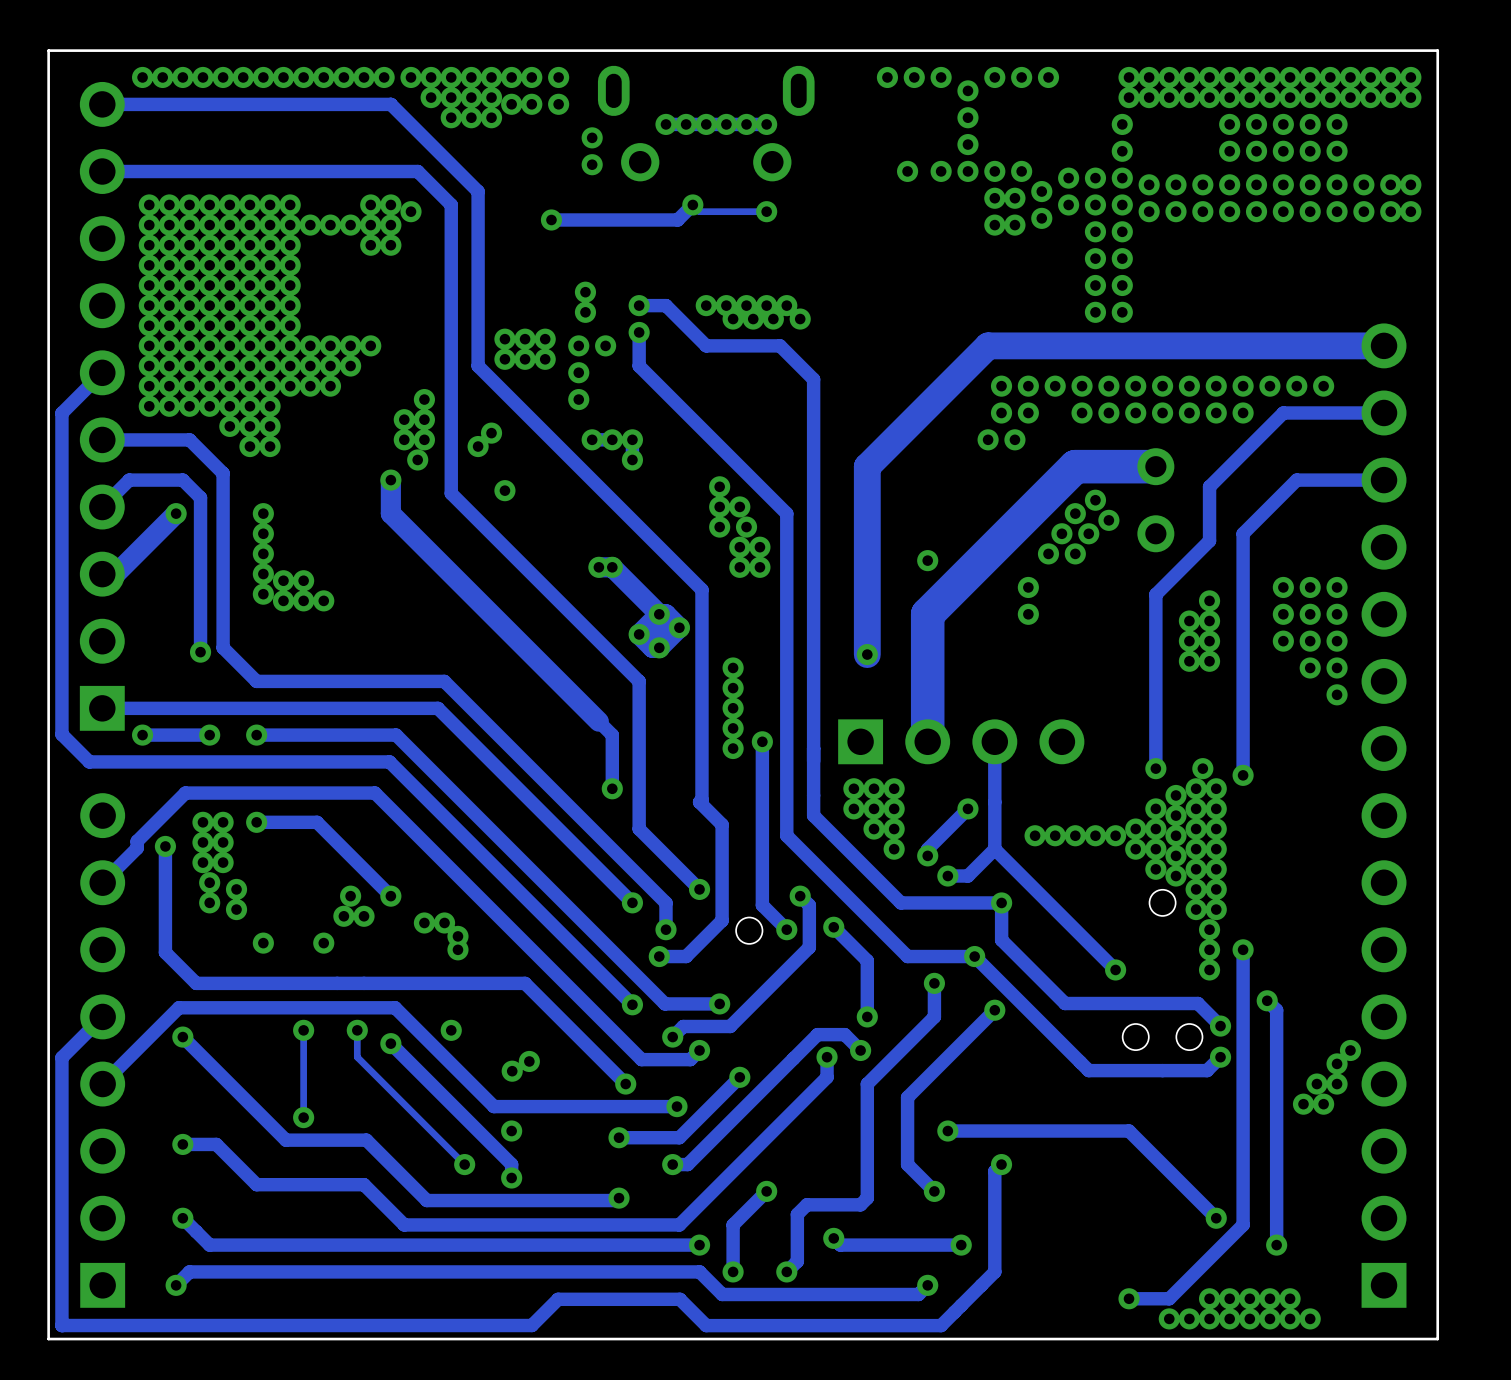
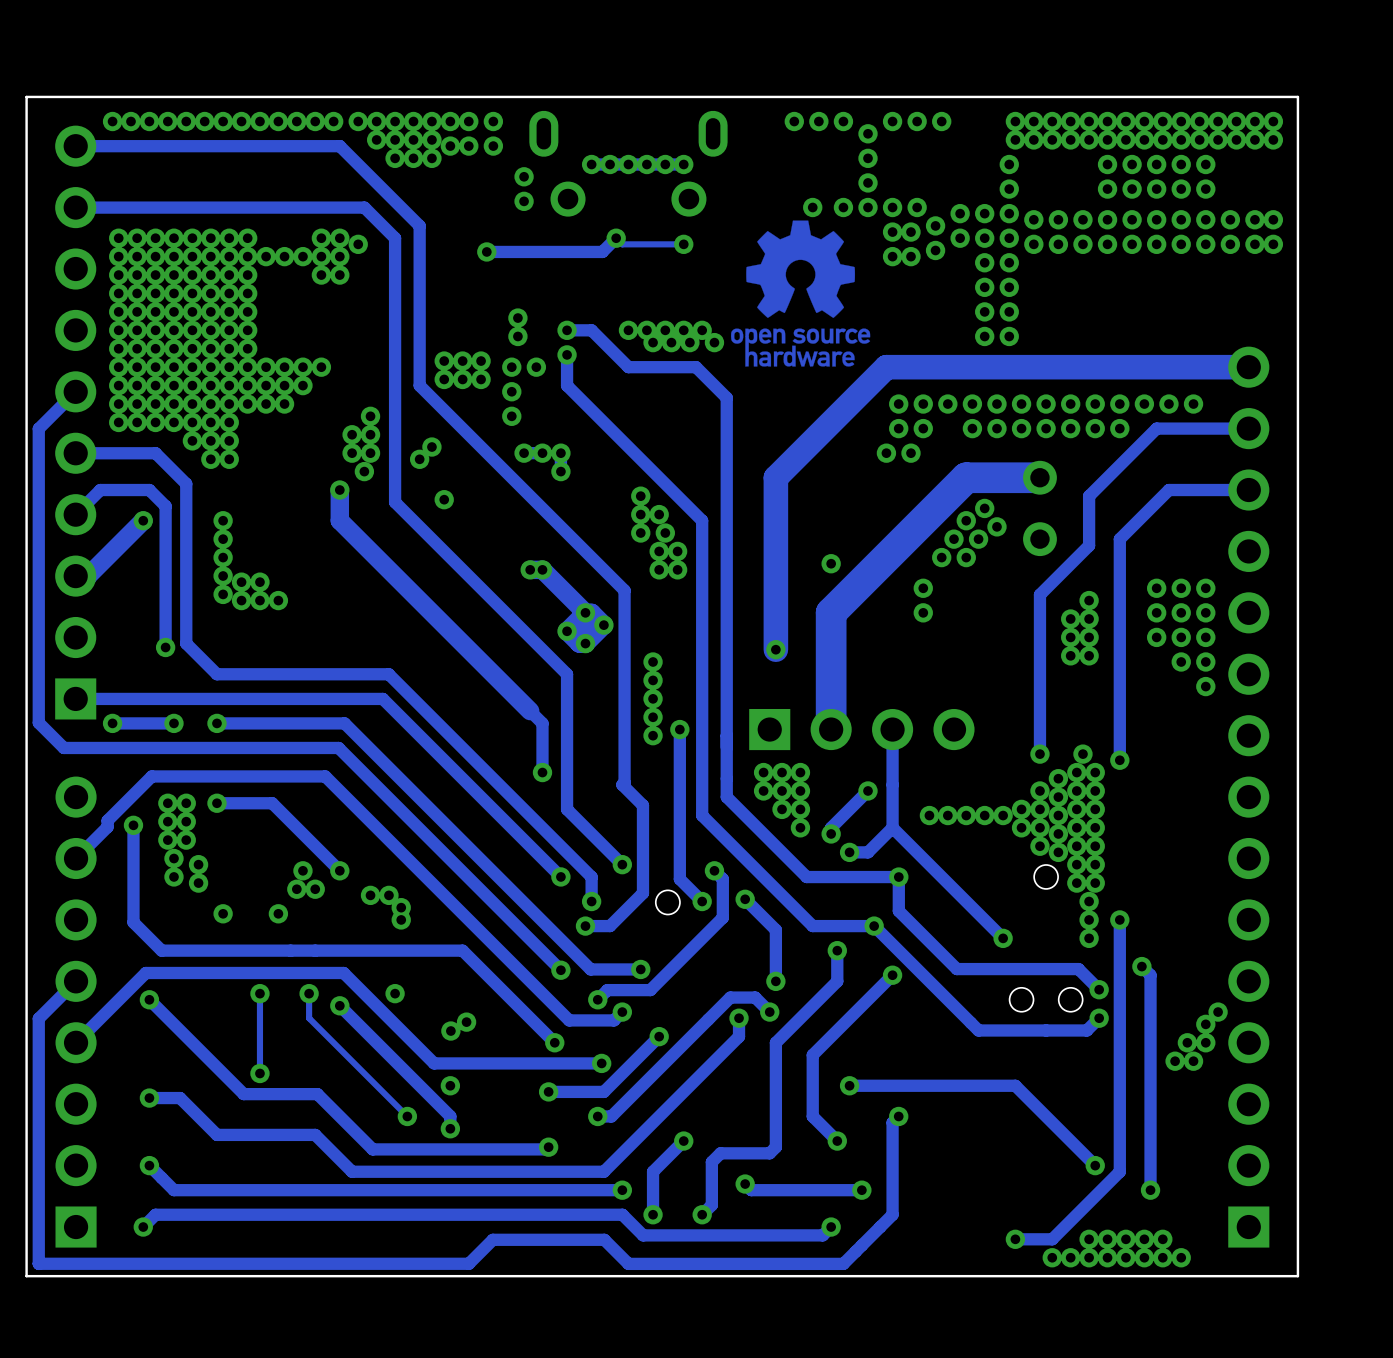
drawing: none -> [731, 220, 871, 367]

